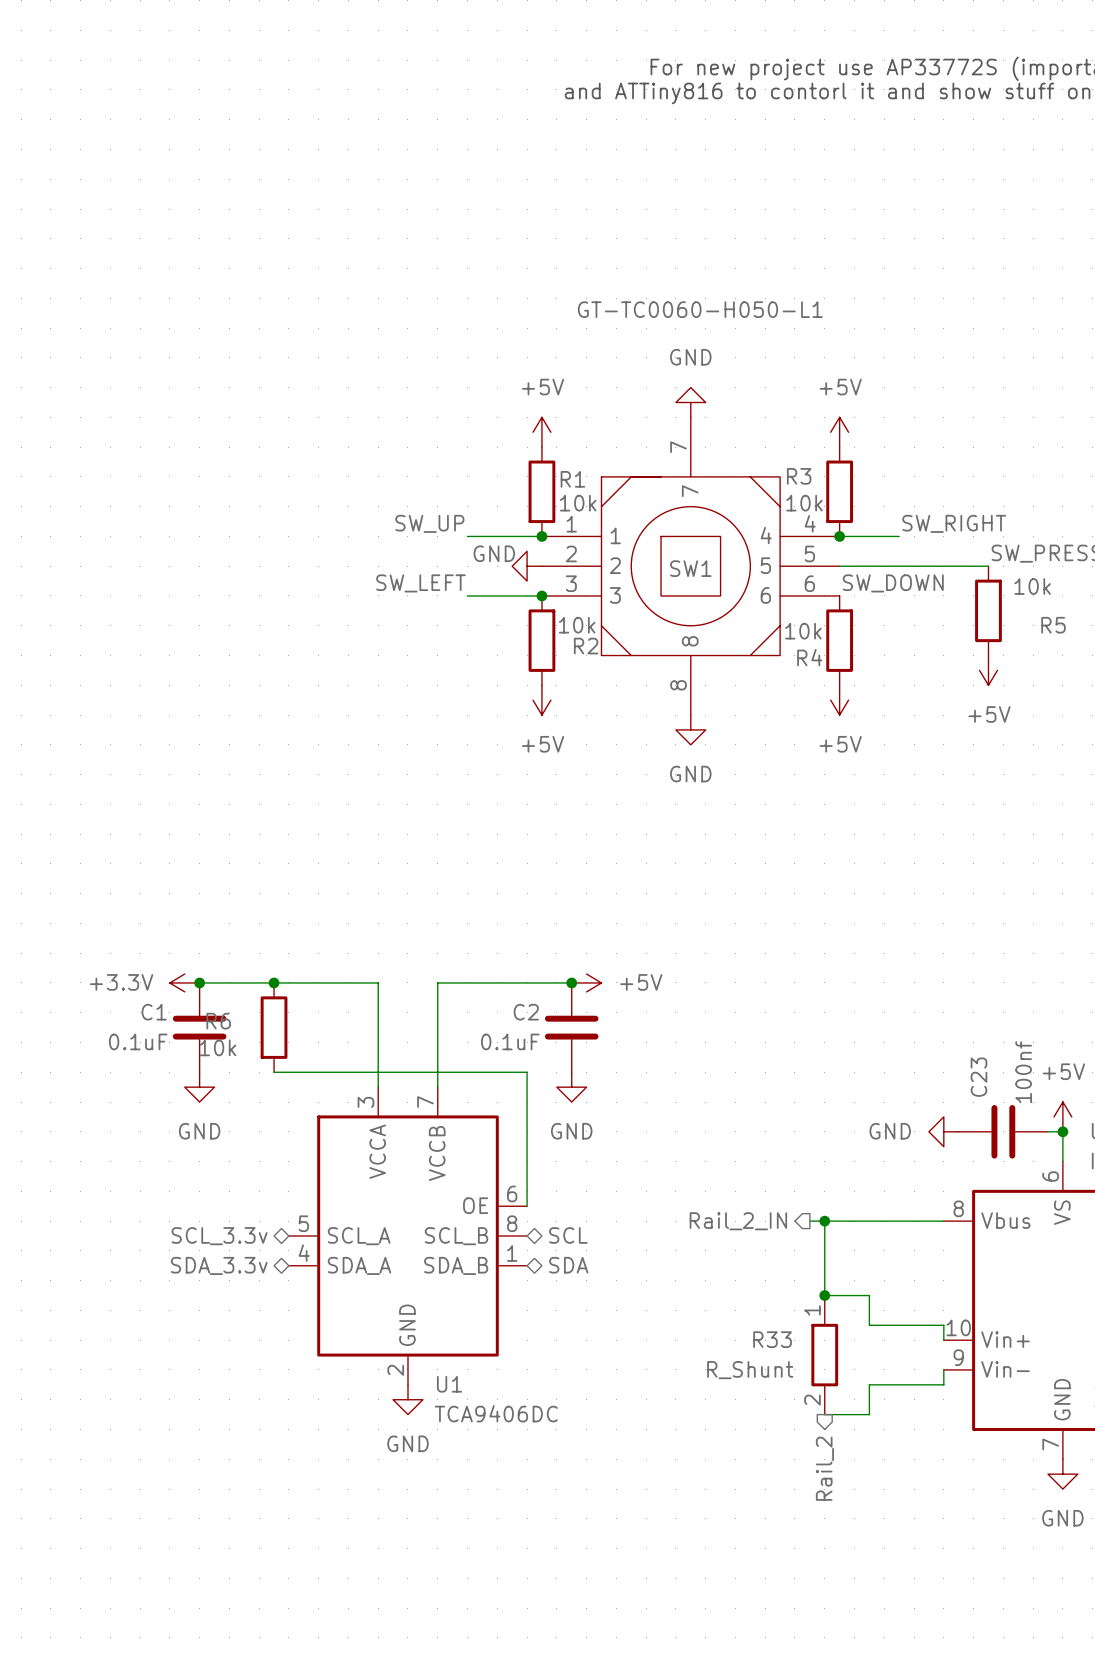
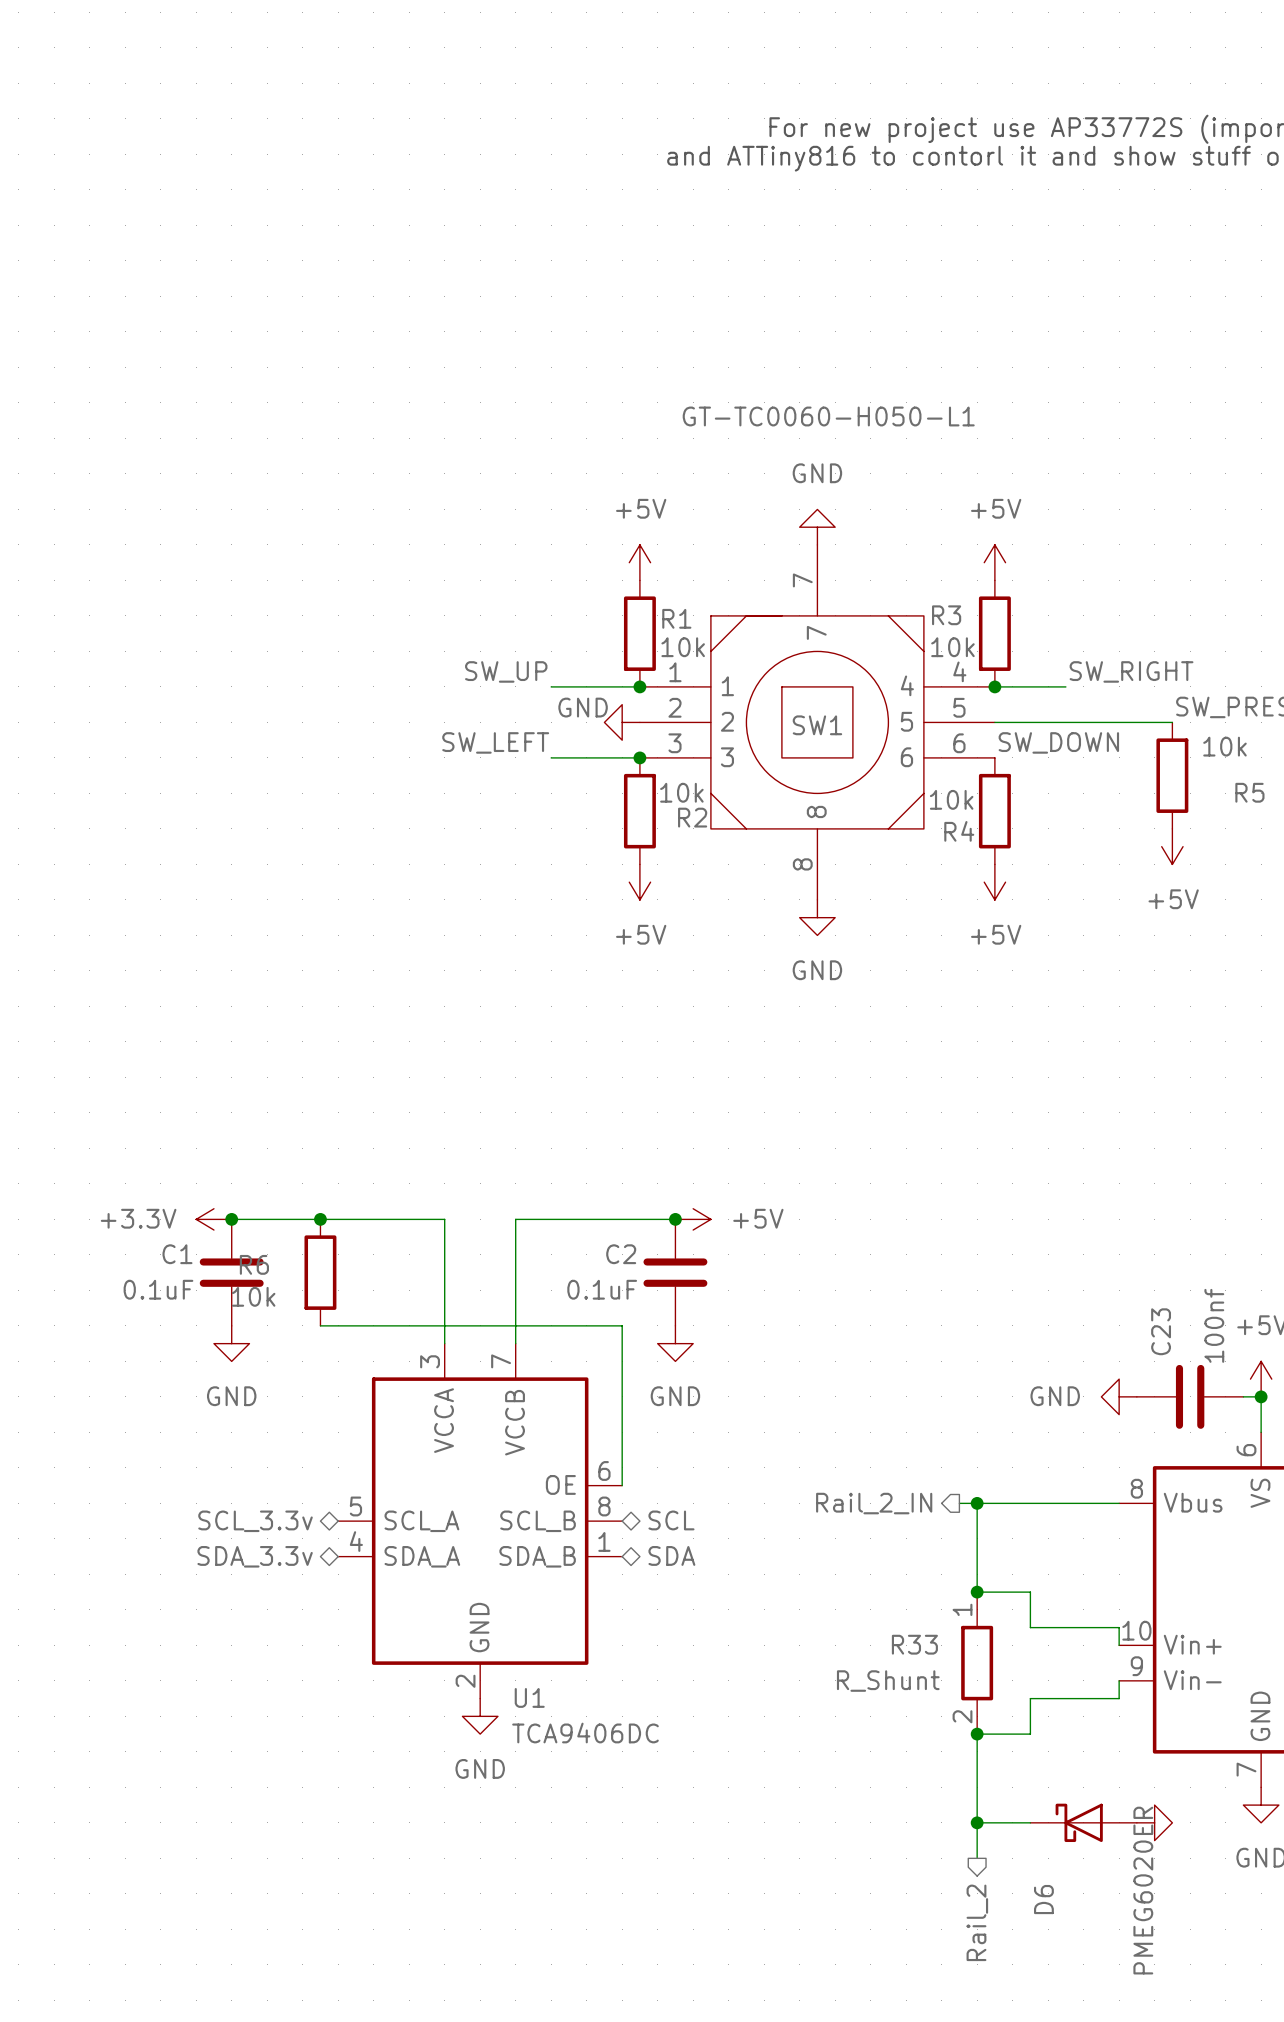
wire: none -> (977, 1734) (977, 1858)
junction: none -> (977, 1734)
hierarchical label position: Rail_2 (824, 1468) -> Rail_2 (977, 1922)
wire: none -> (977, 1822) (1030, 1822)
junction: none -> (977, 1822)
D6: none -> PMEG6020ER (1083, 1822)
power symbol: none -> (1154, 1822)

